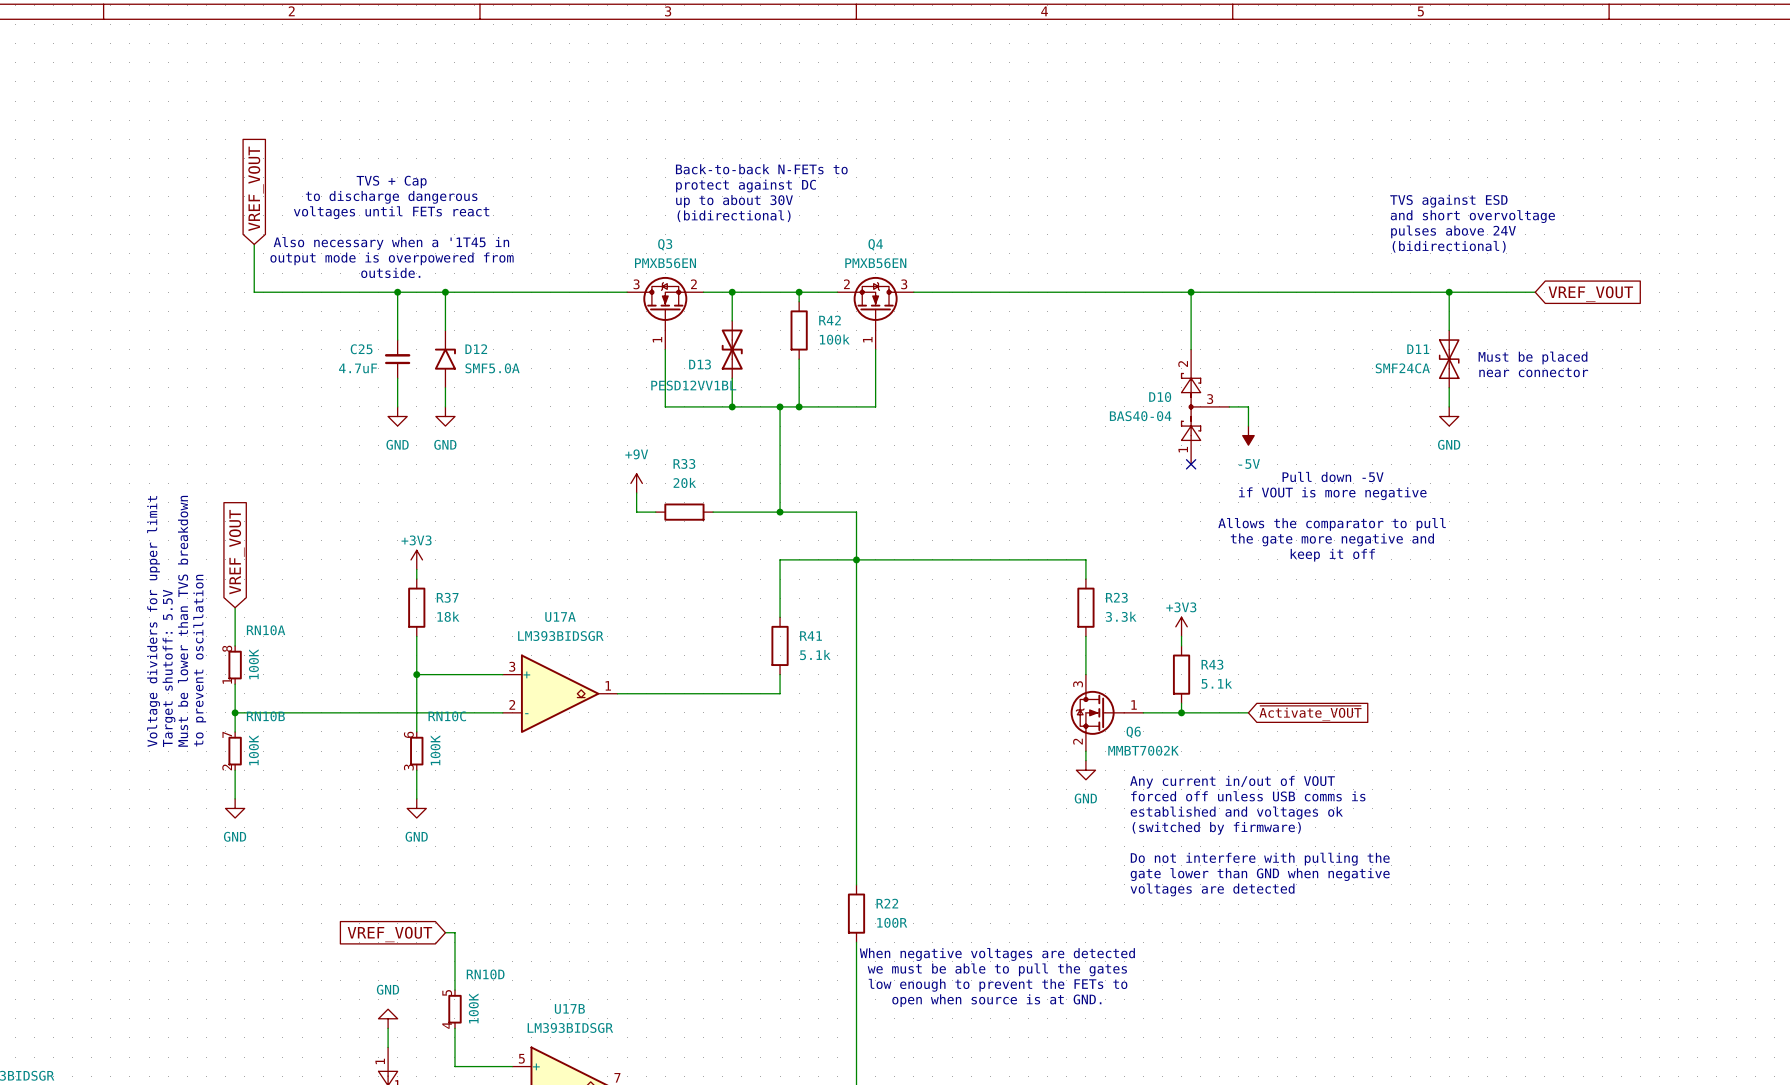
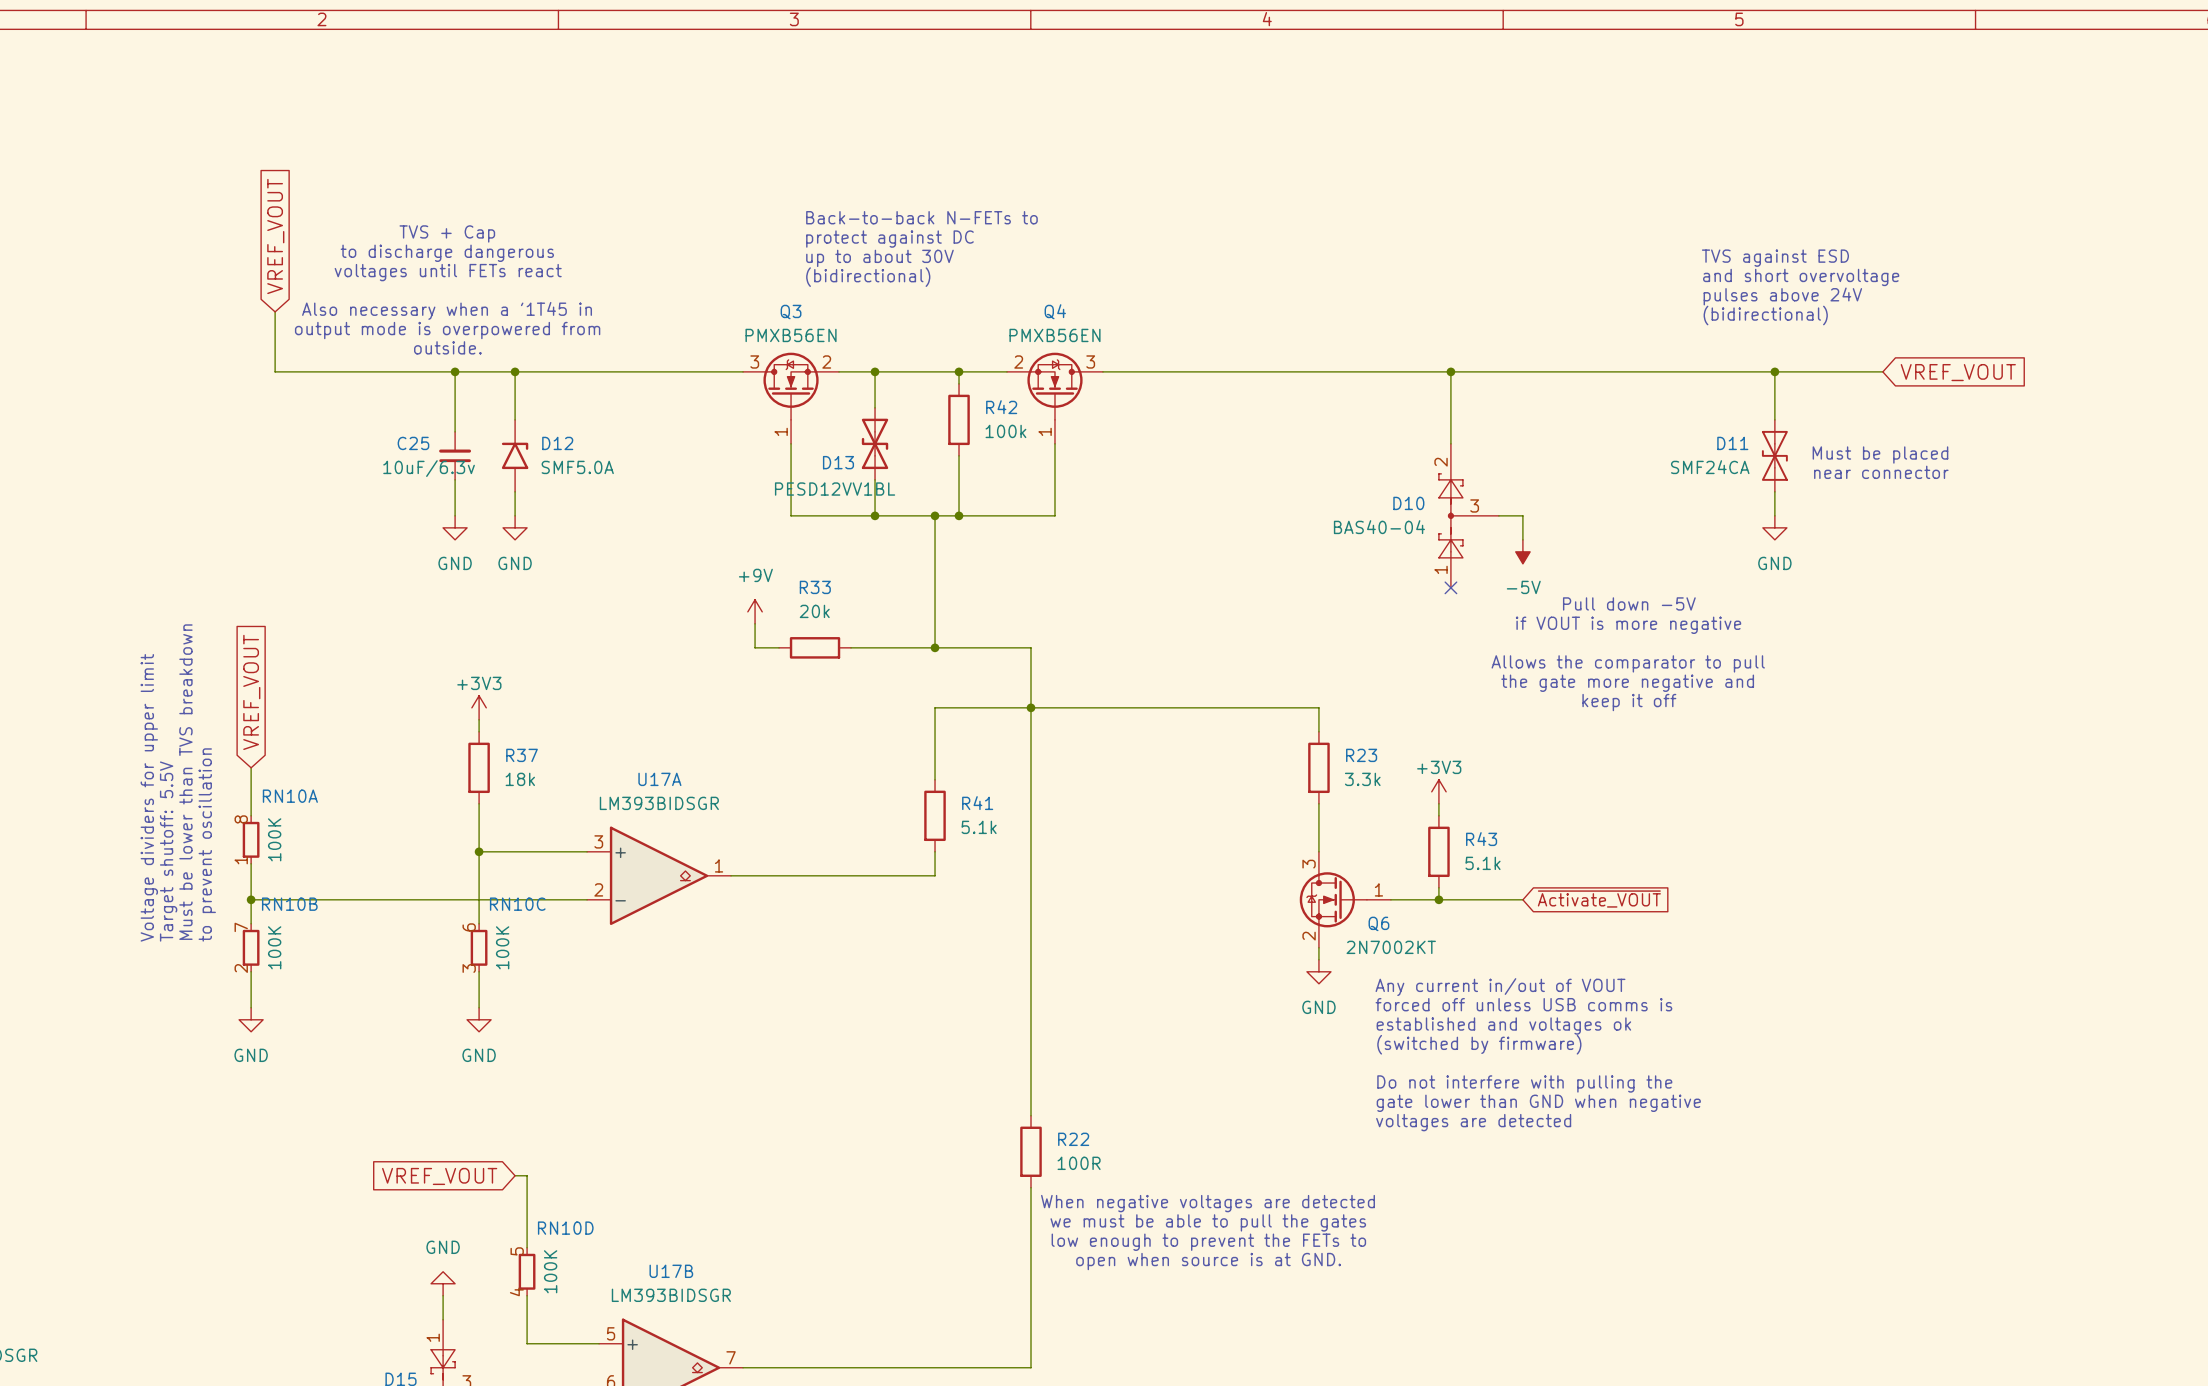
C25 value: 4.7uF (358, 368) -> 10uF/6.3v (429, 468)
Q6 value: MMBT7002K (1143, 750) -> 2N7002KT (1391, 947)

